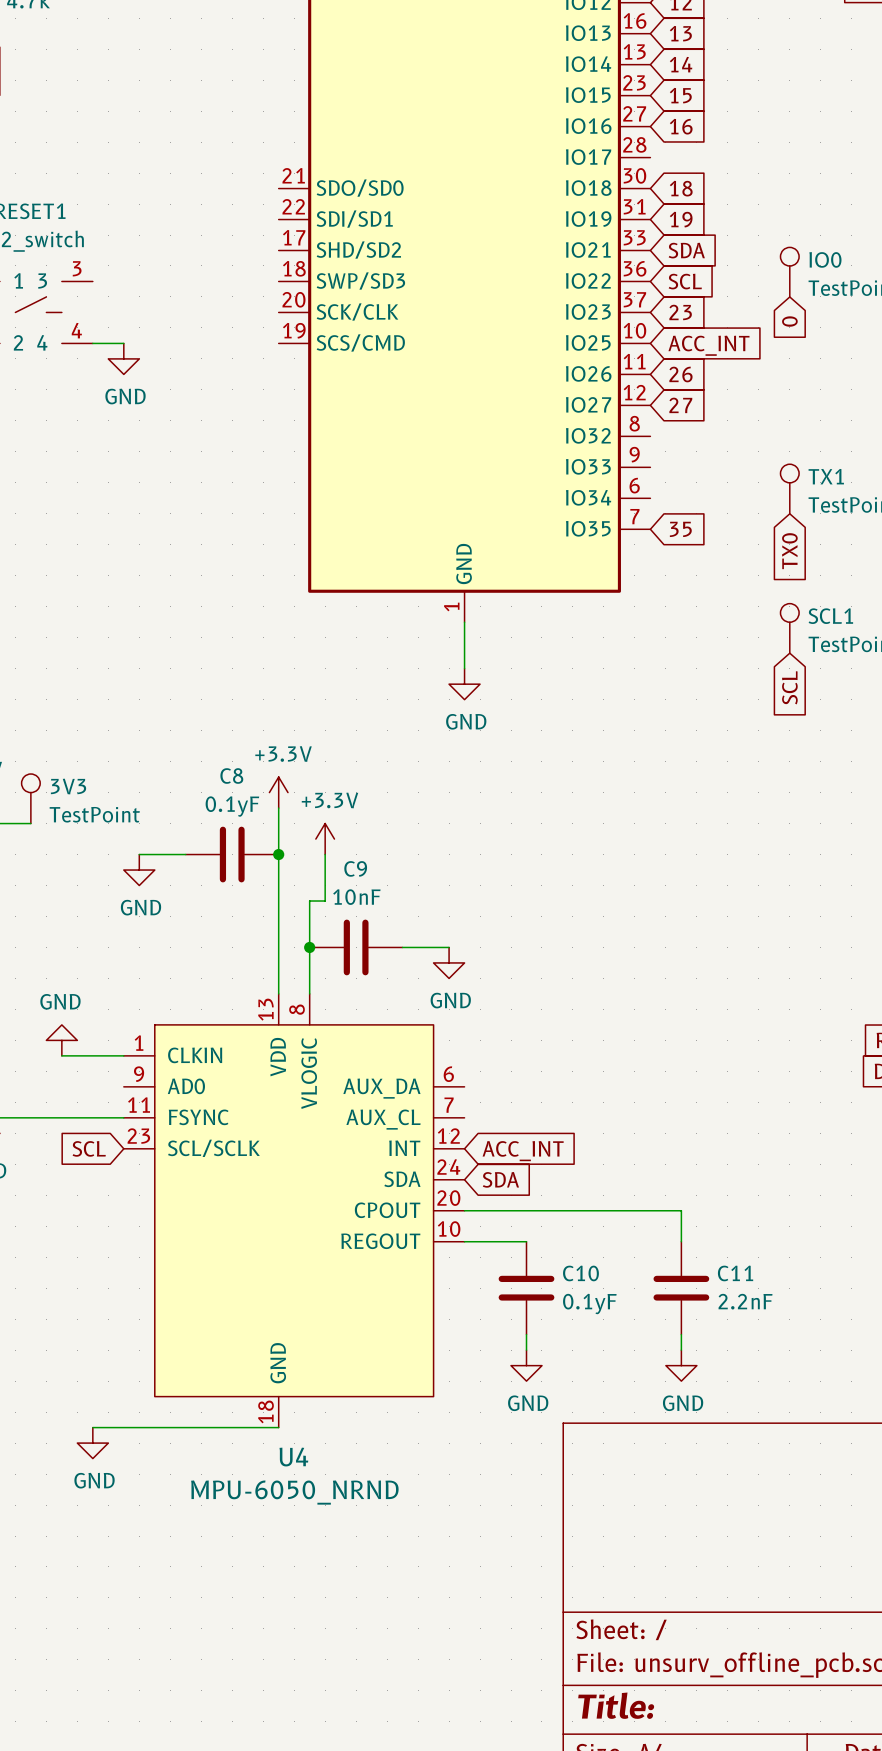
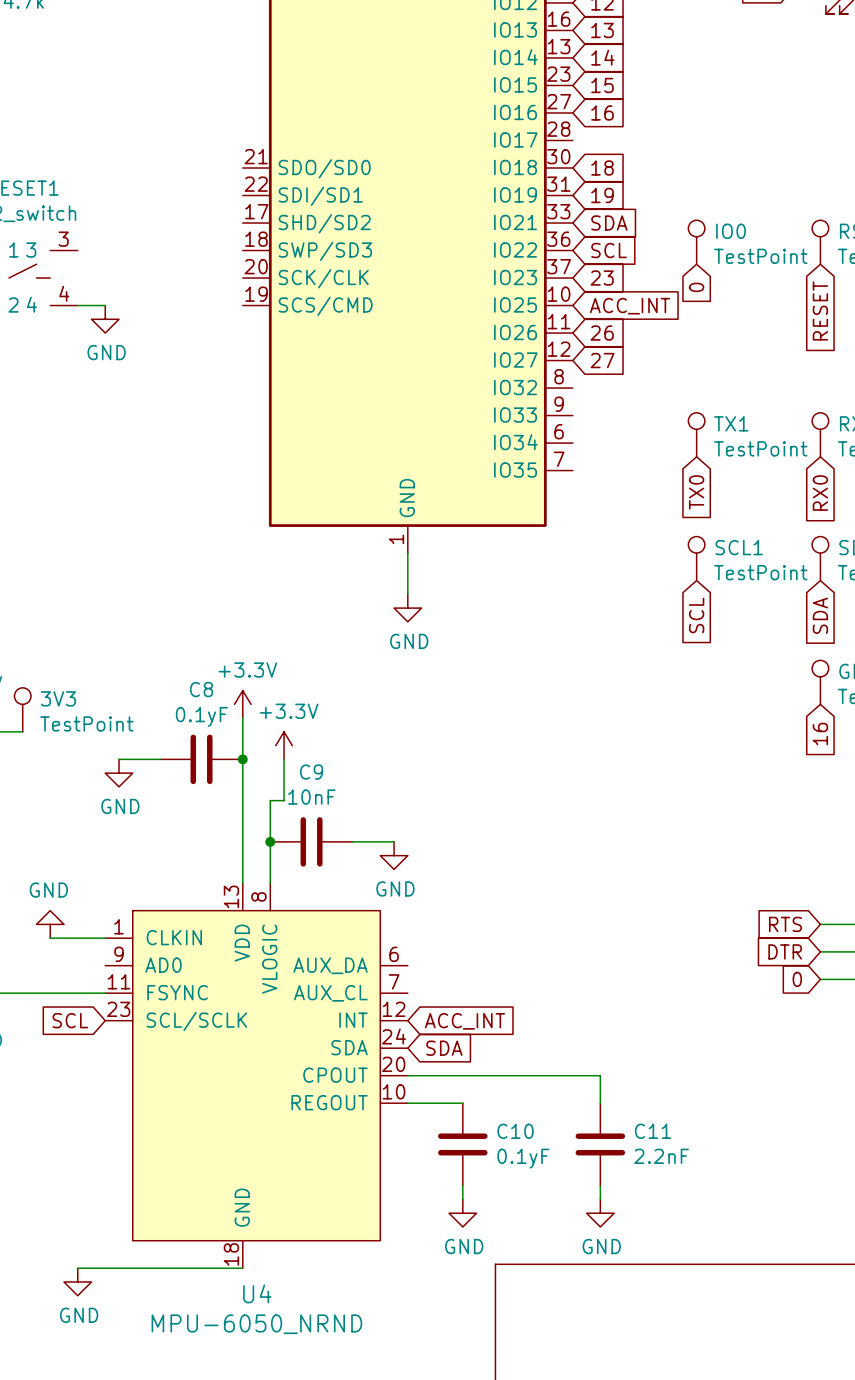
global label: 35 (680, 529) -> none

